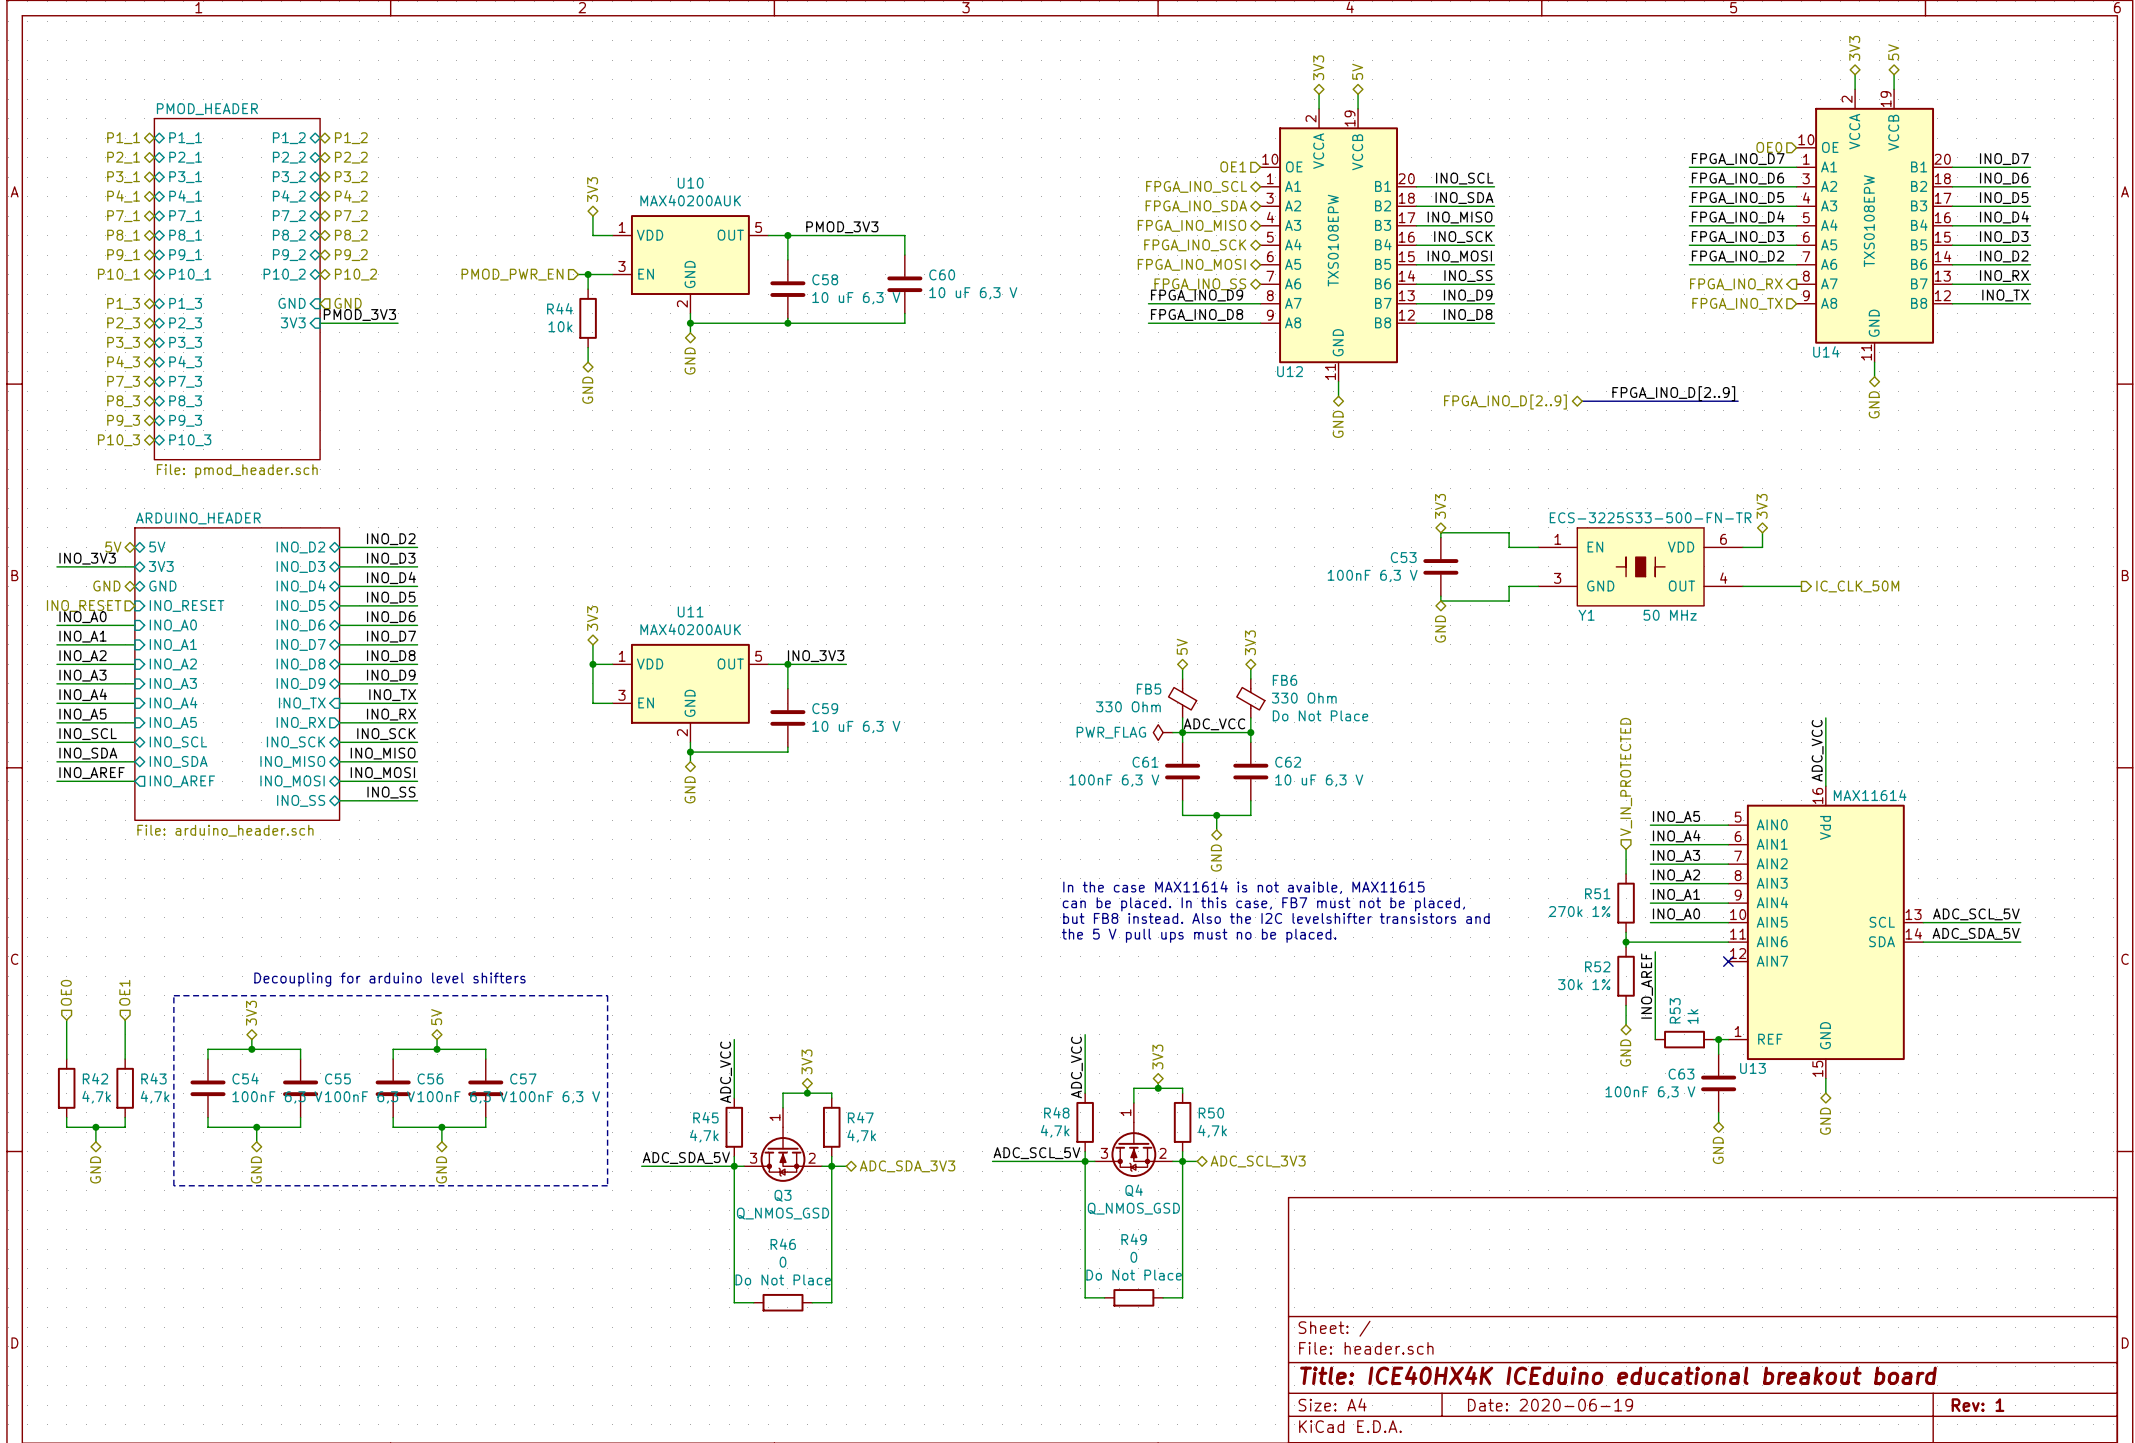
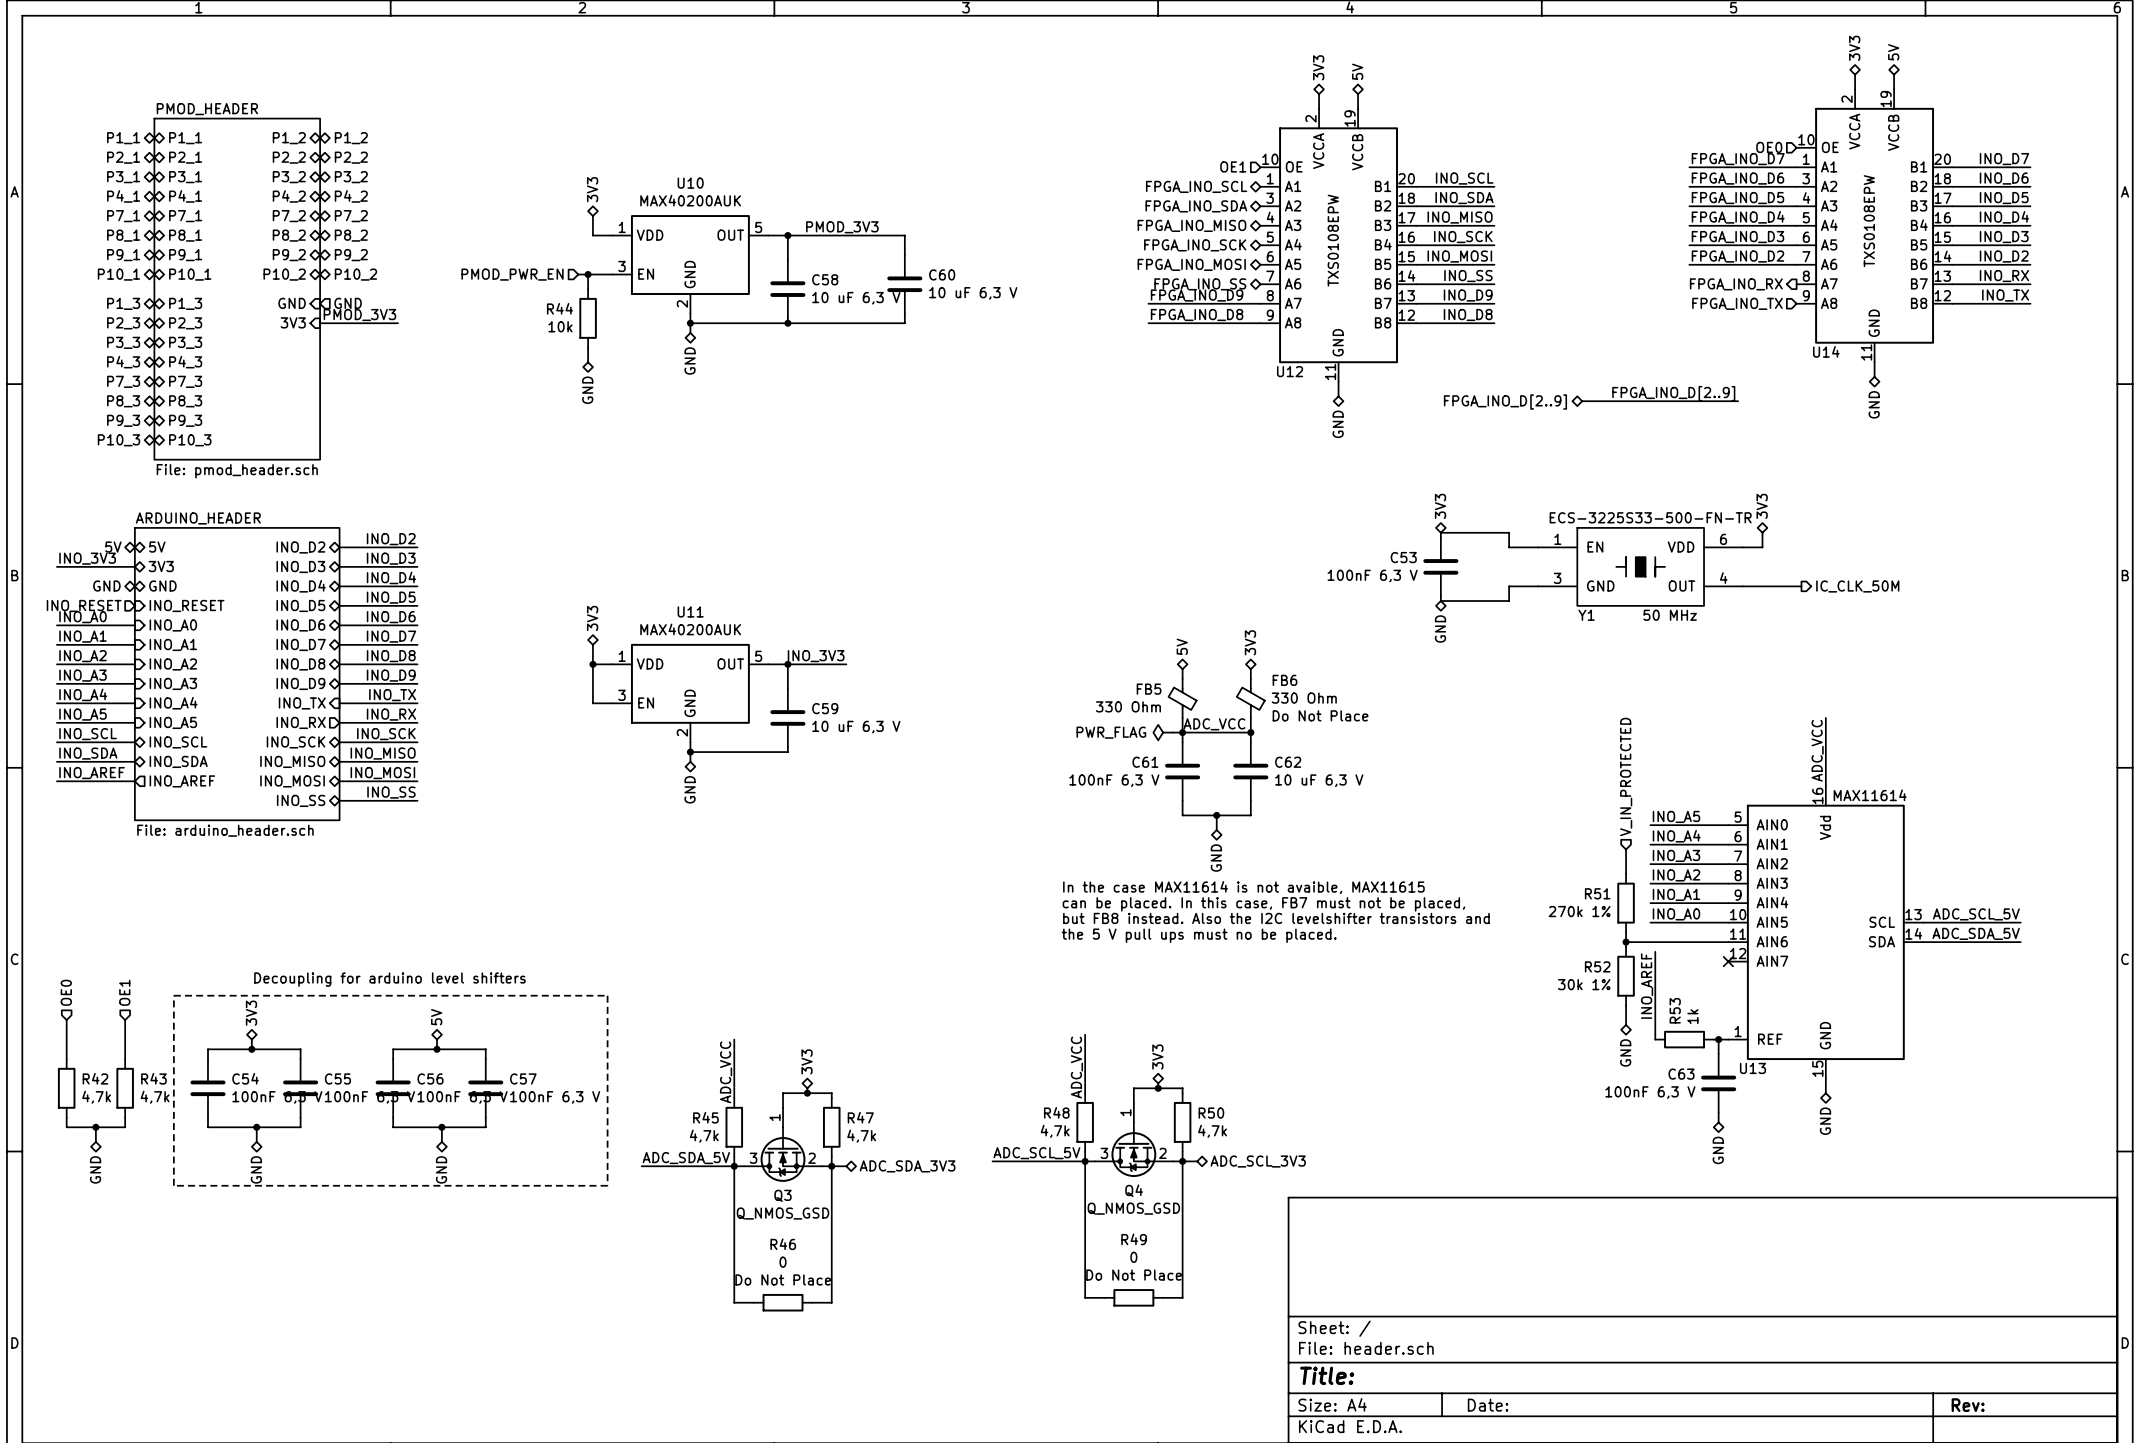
title block: Title: ICE40HX4K ICEduino educational breakout board (1618, 1375) -> Title: (1327, 1375)
title block: Date: 2020-06-19 (1550, 1405) -> Date: (1488, 1405)
title block: Rev: 1 (1978, 1405) -> Rev: (1968, 1405)

